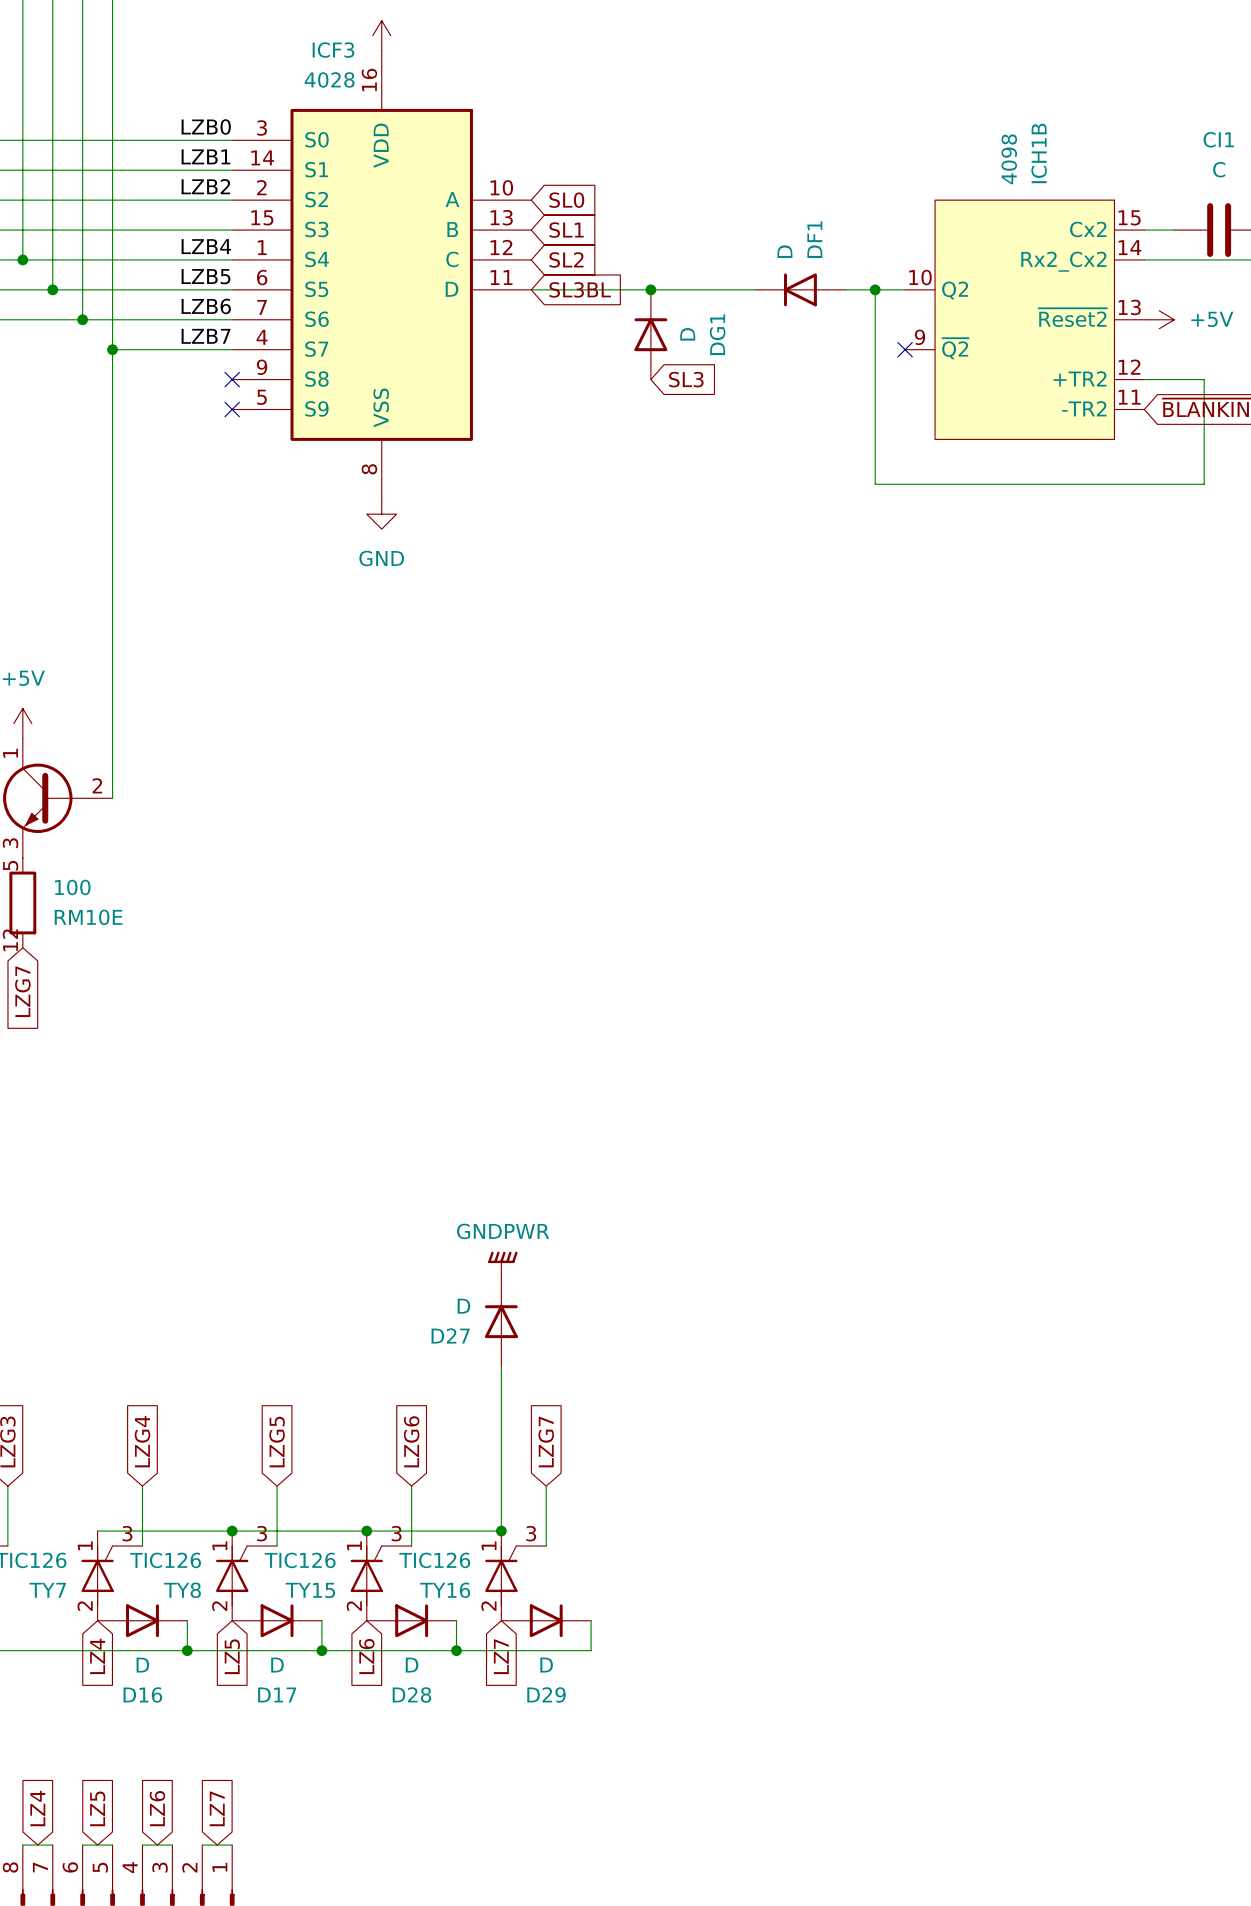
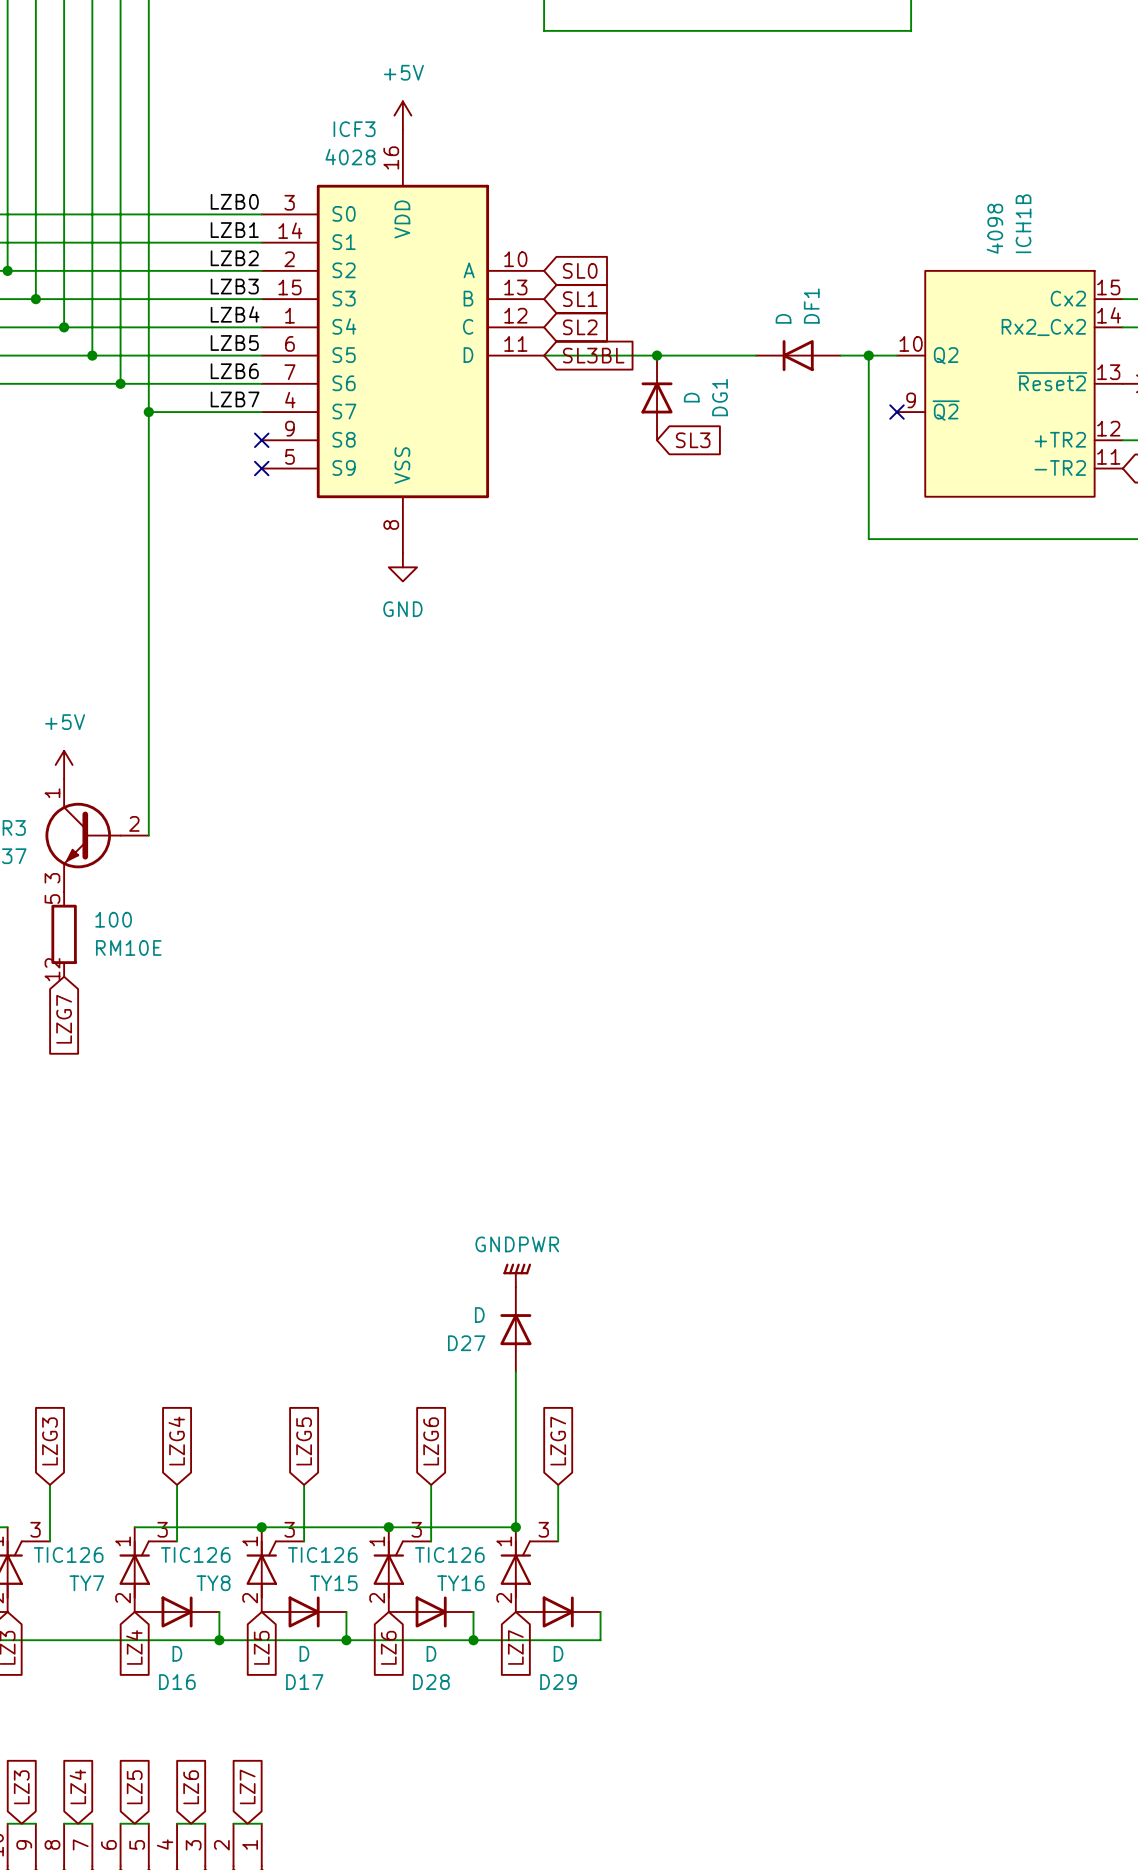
label: none -> LZB3 (234, 286)

